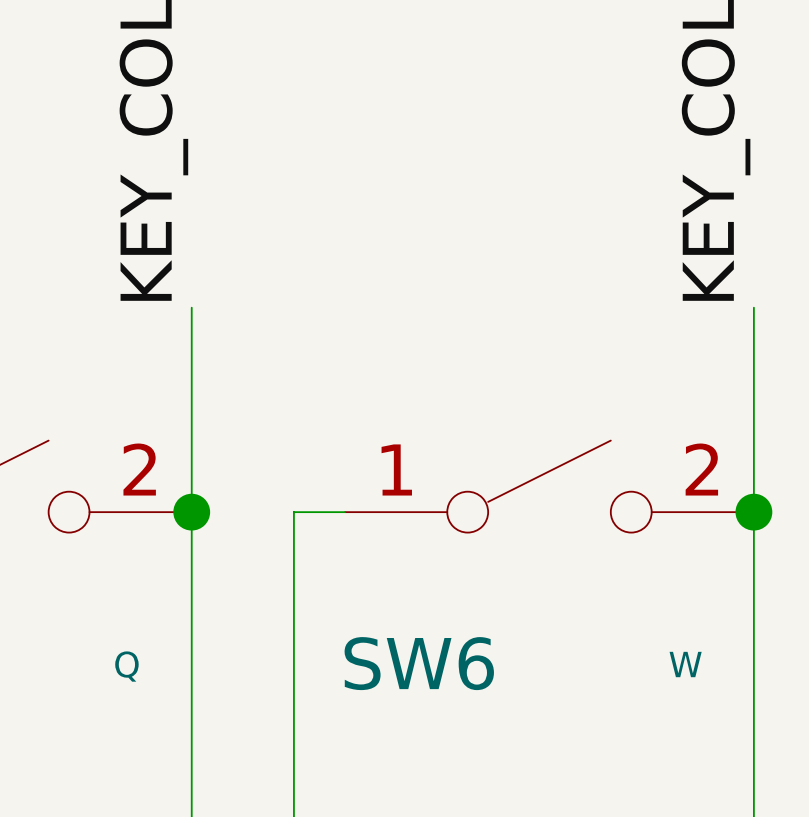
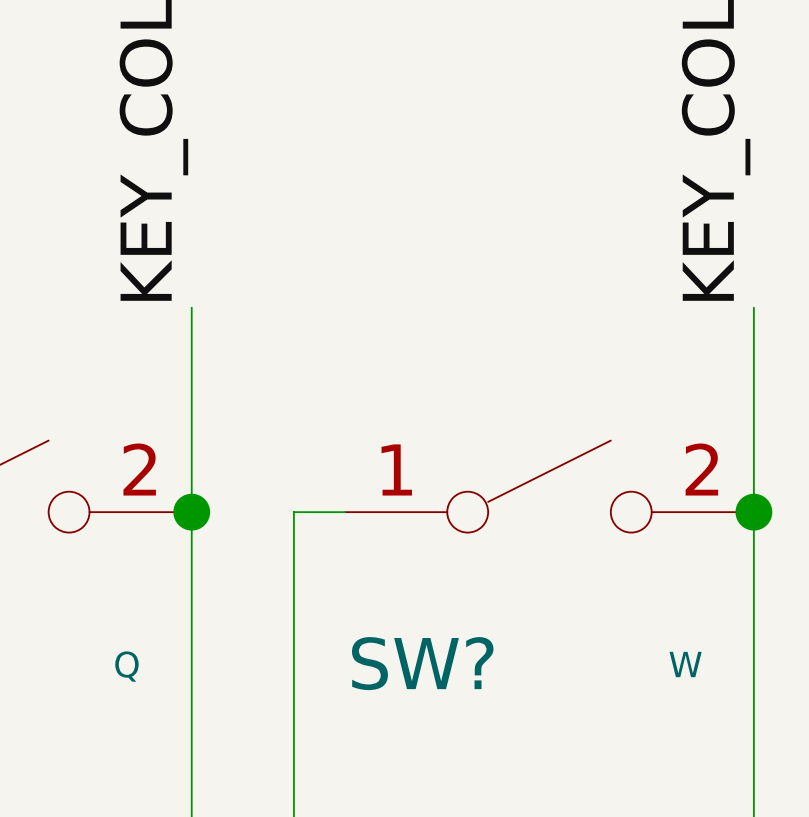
SW6 name: SW6 (419, 663) -> SW? (422, 663)

